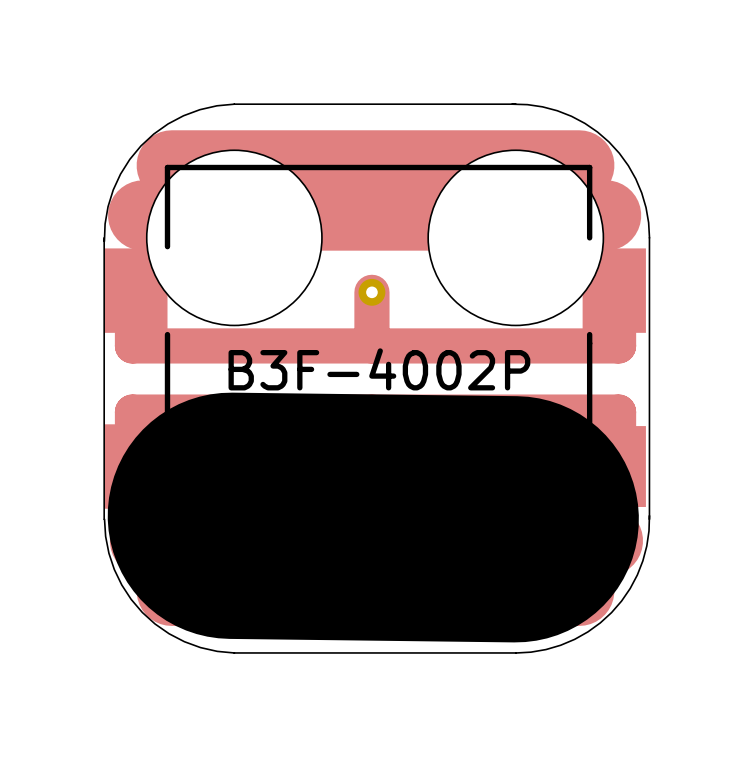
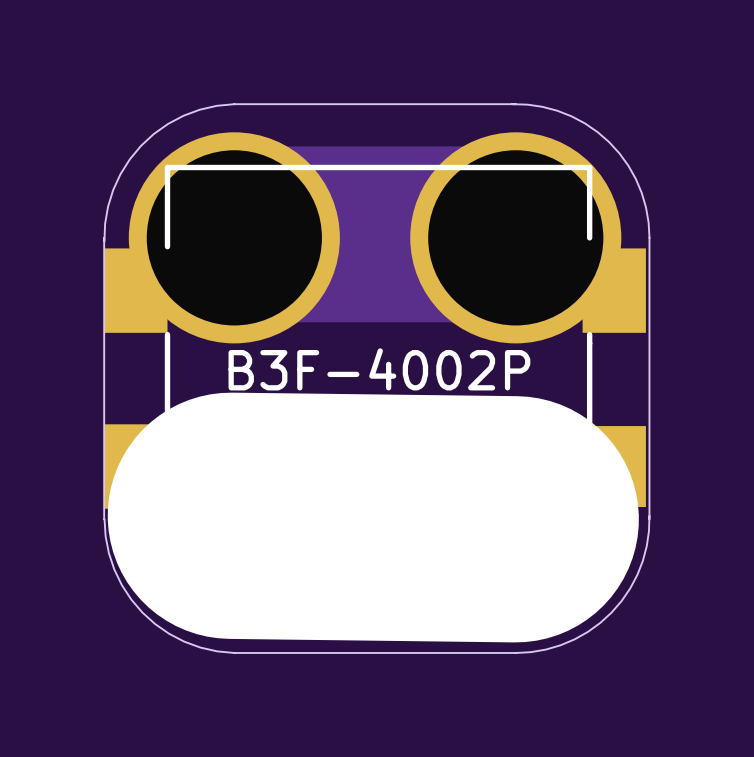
part footprint: [103, 103, 651, 654] -> [103, 103, 651, 654]

